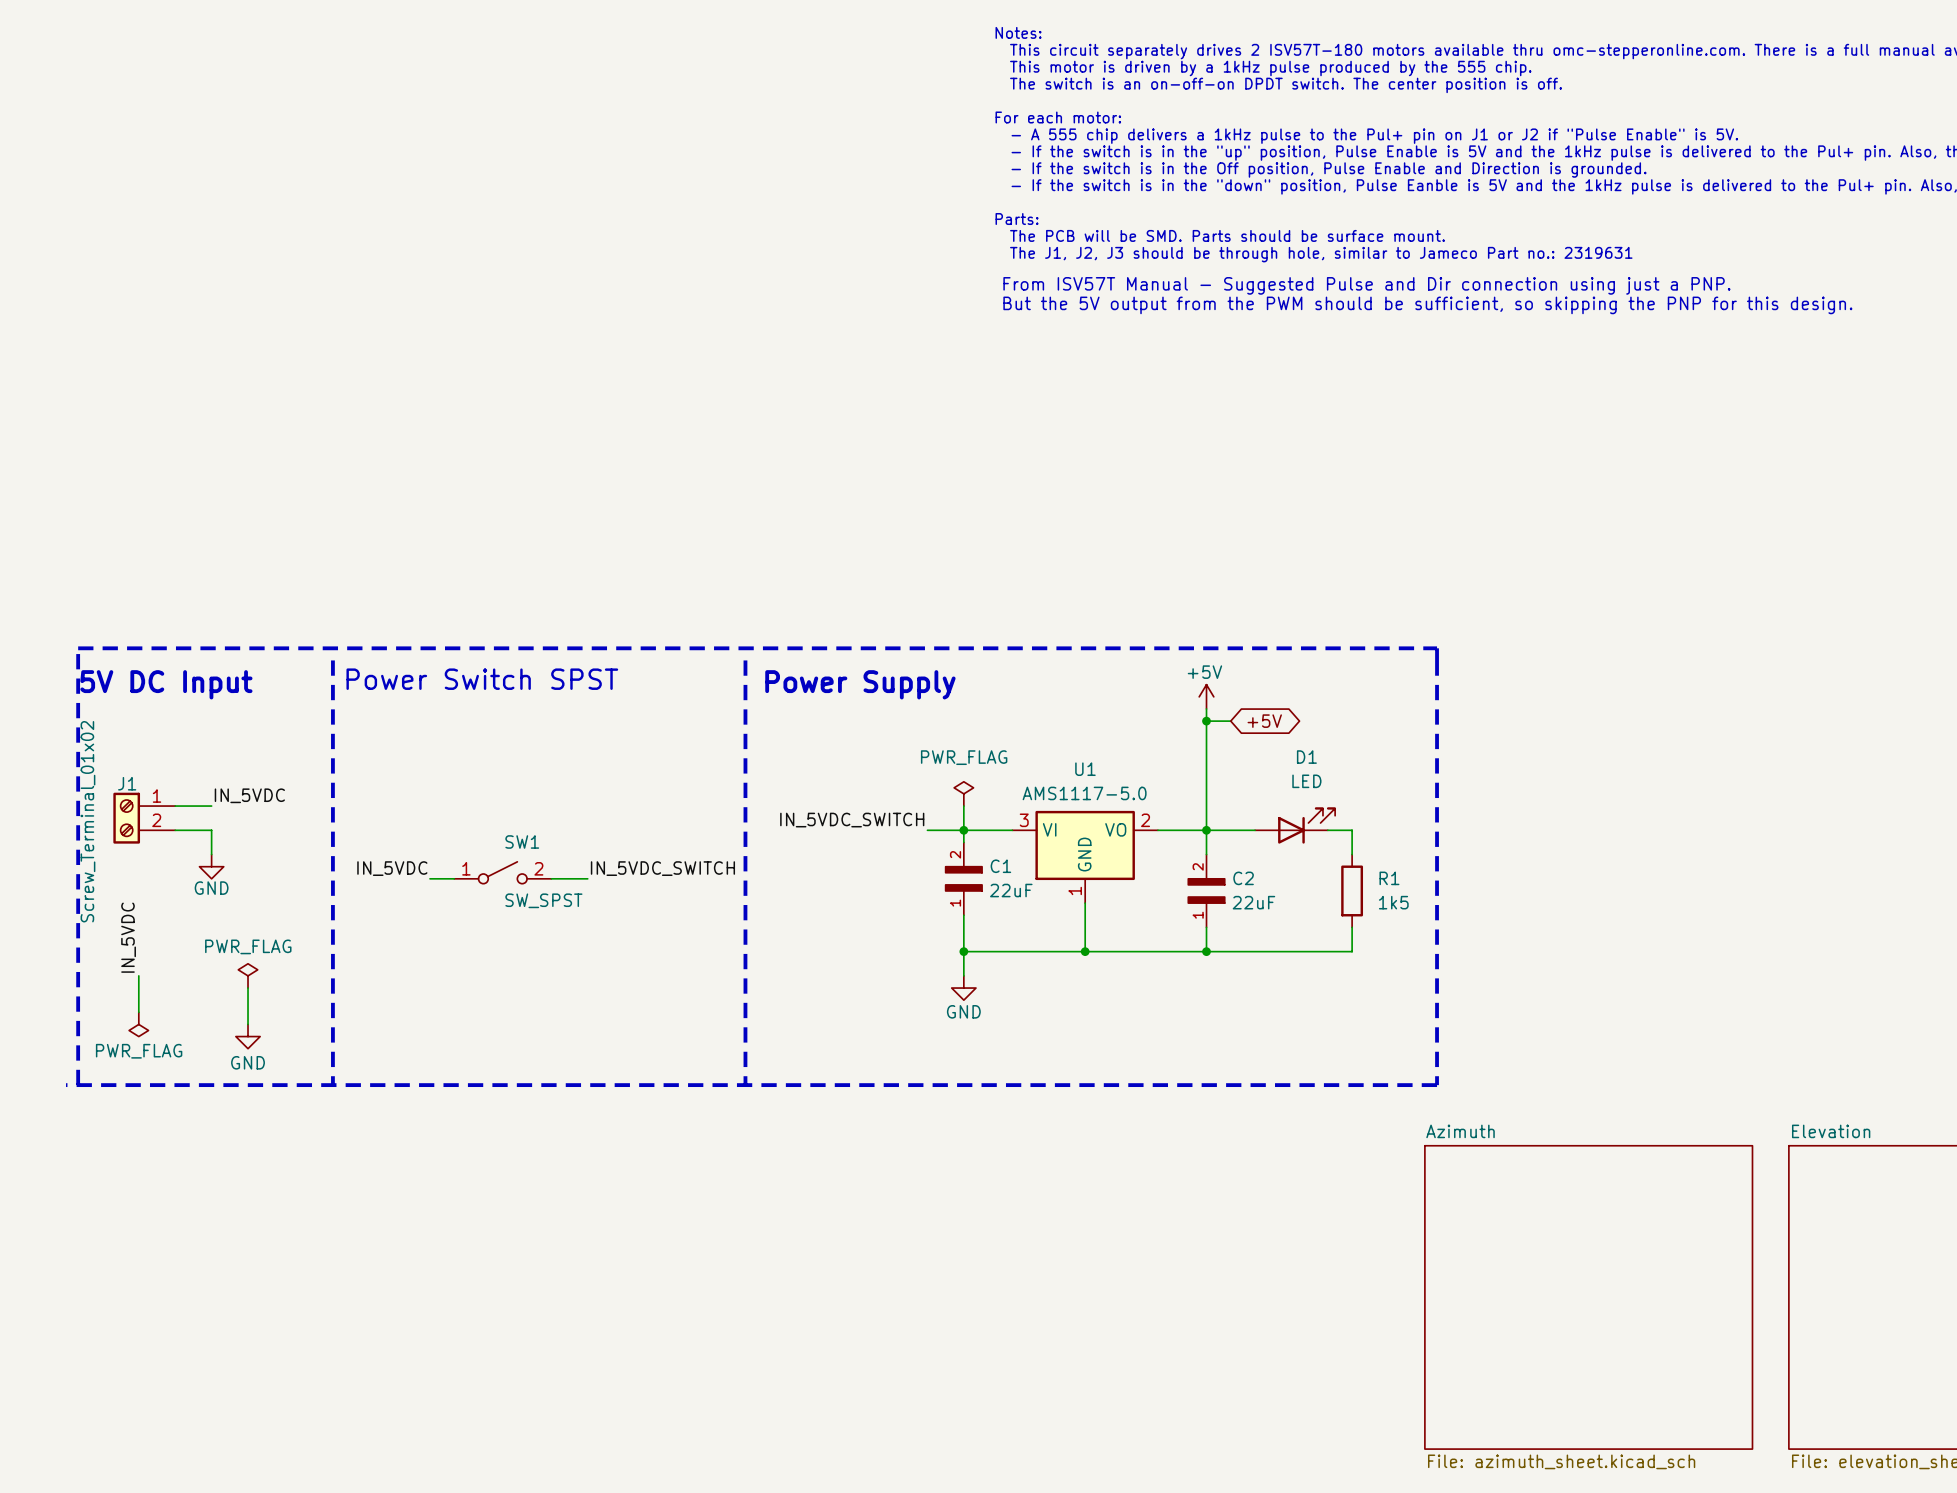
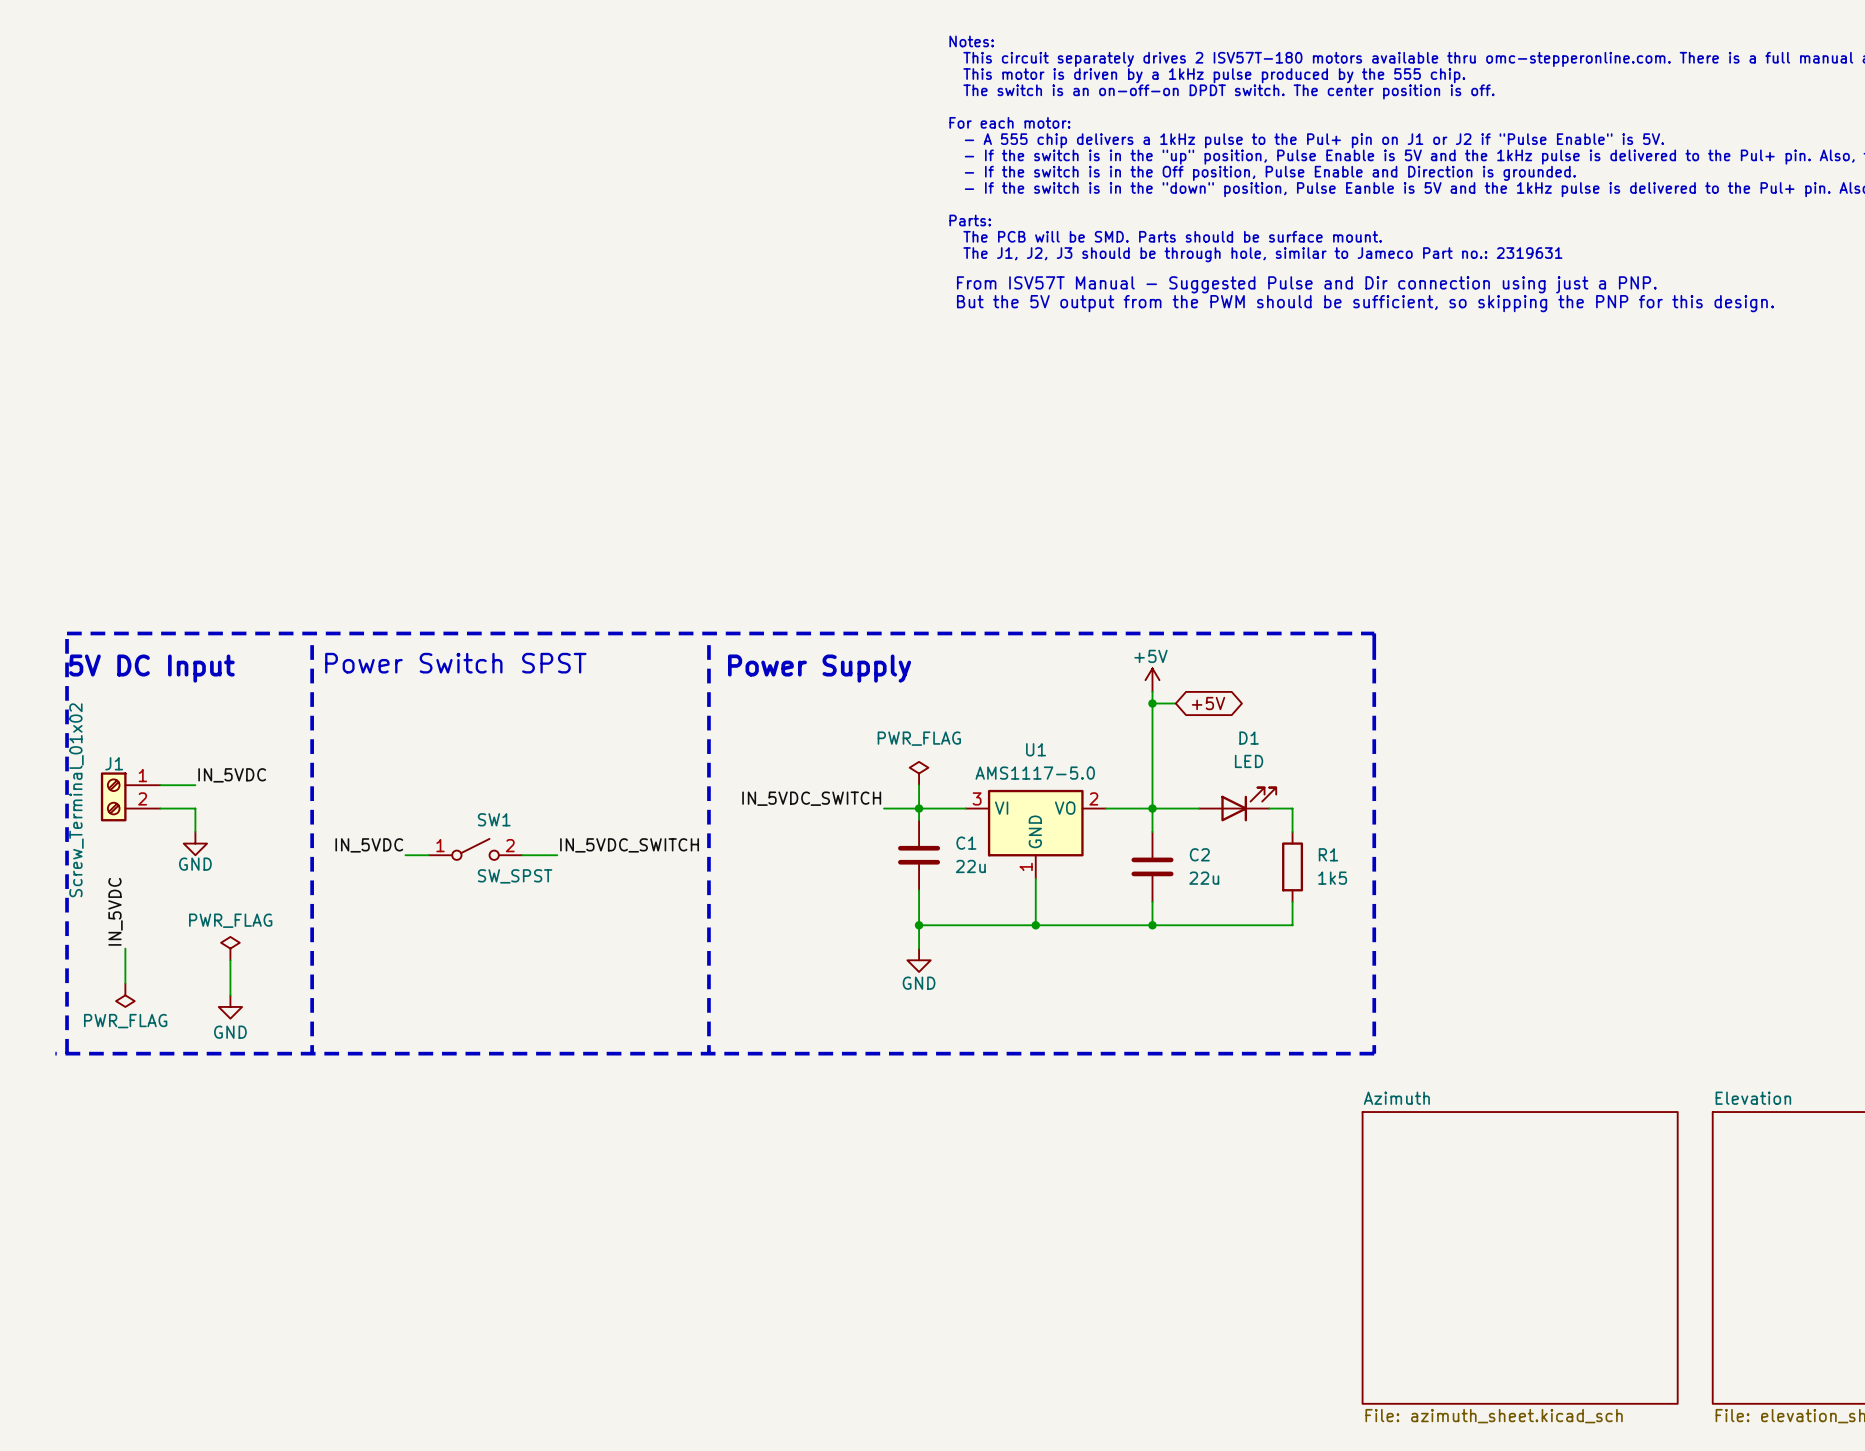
C1 symbol: [945, 842, 983, 916] -> [898, 820, 941, 891]
C2 symbol: [1187, 854, 1226, 928] -> [1131, 831, 1174, 902]
C1 value: 22uF (1011, 890) -> 22u (970, 866)
C2 value: 22uF (1253, 902) -> 22u (1204, 878)

